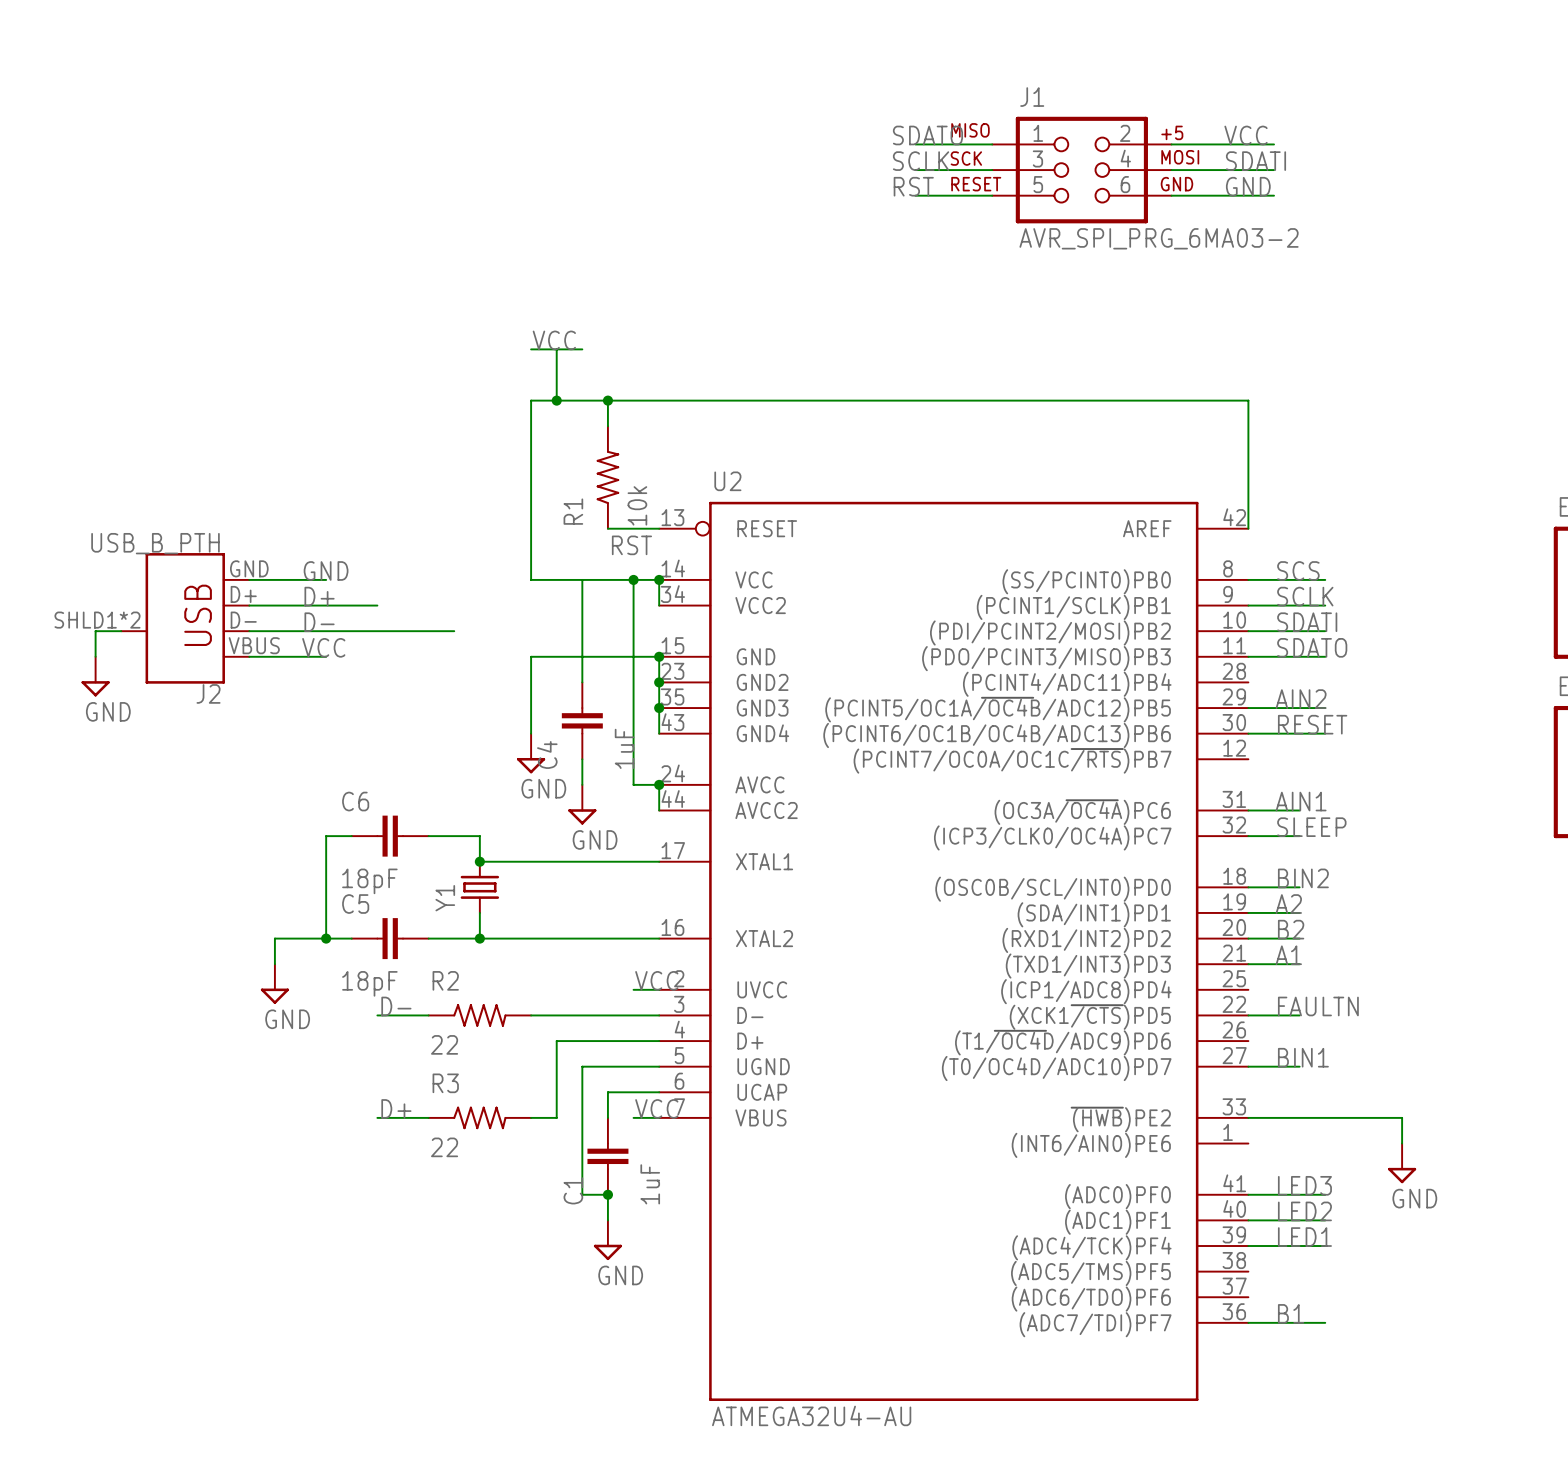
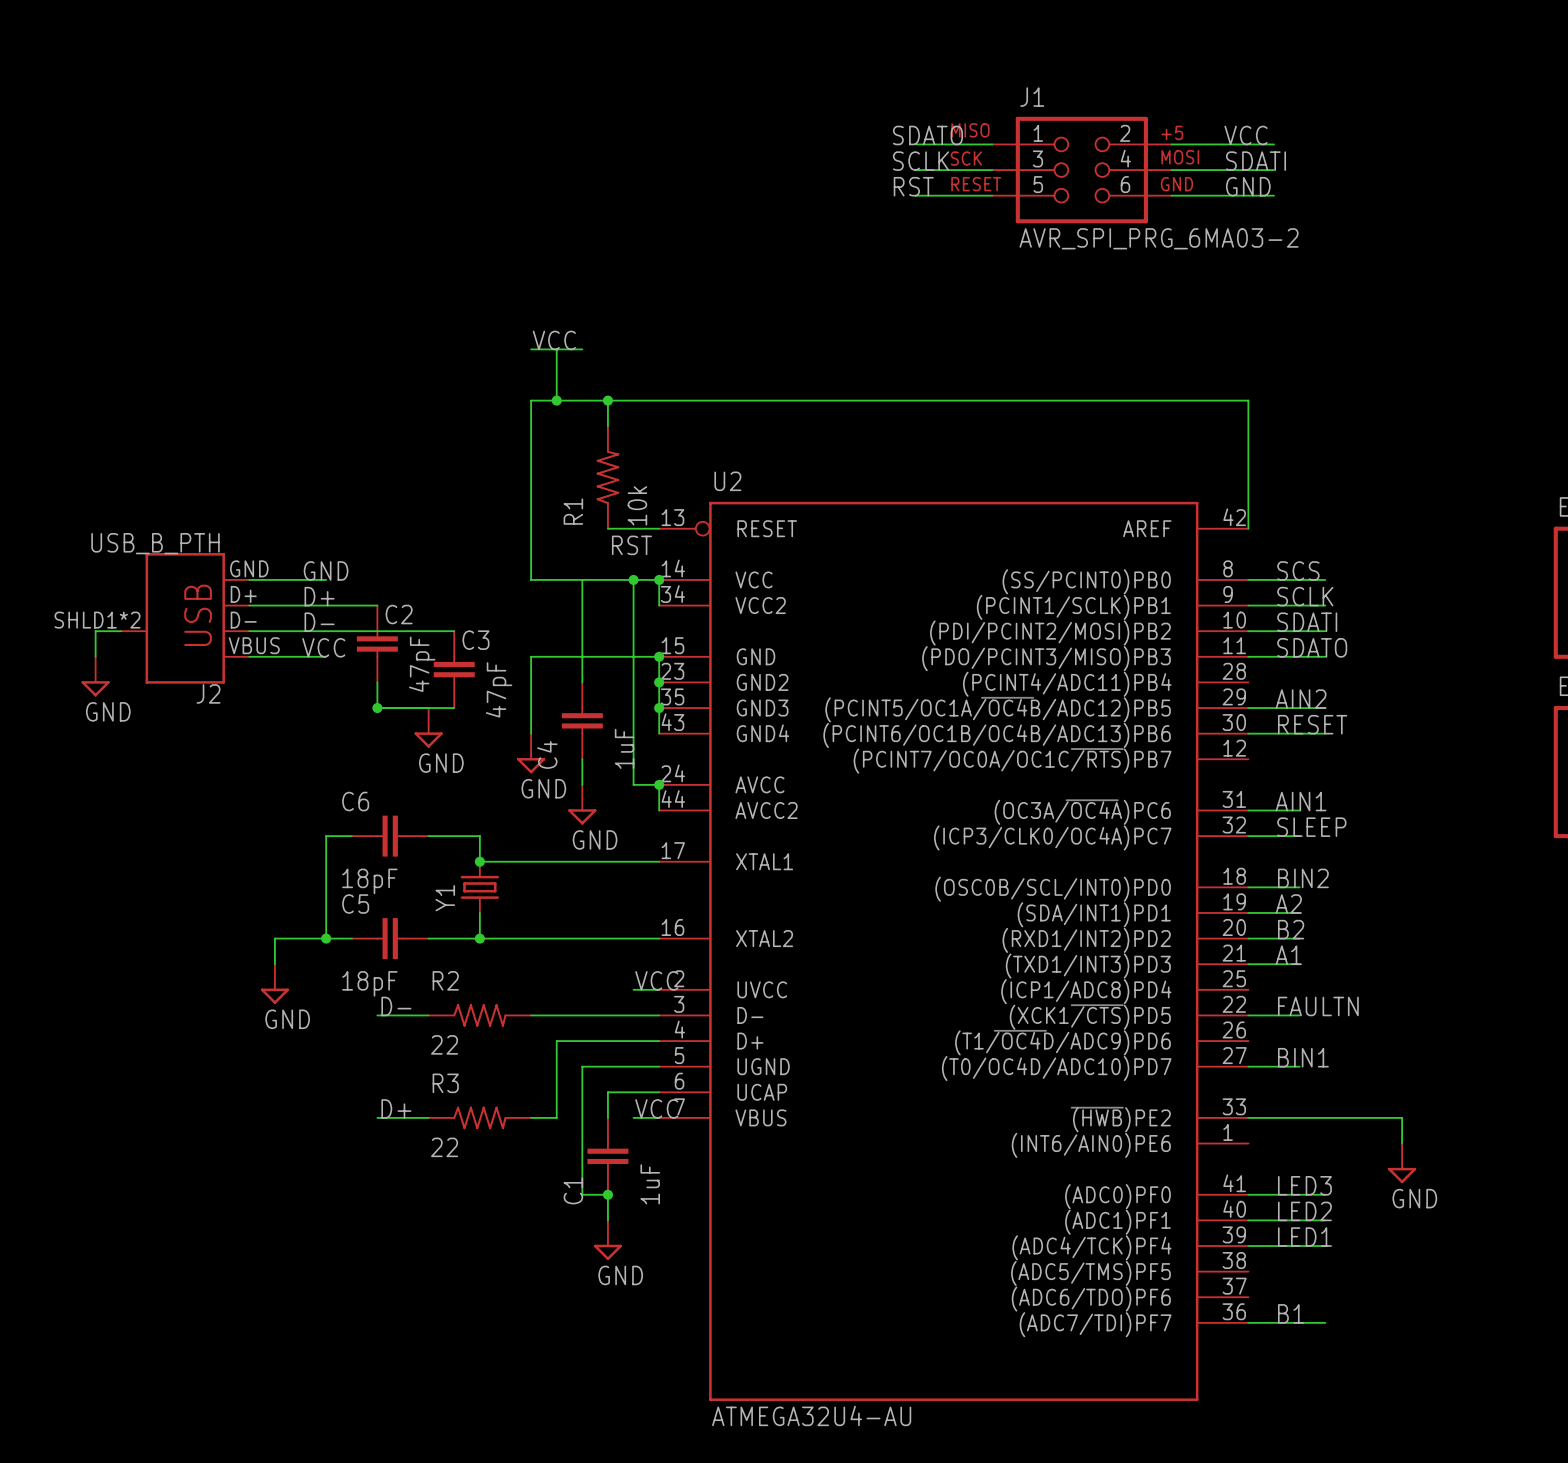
C2: none -> 47pF (377, 643)
C3: none -> 47pF (454, 669)
wire: none -> (377, 682) (377, 708) (454, 708)
junction: none -> (377, 708)
power symbol: none -> GND (428, 727)

